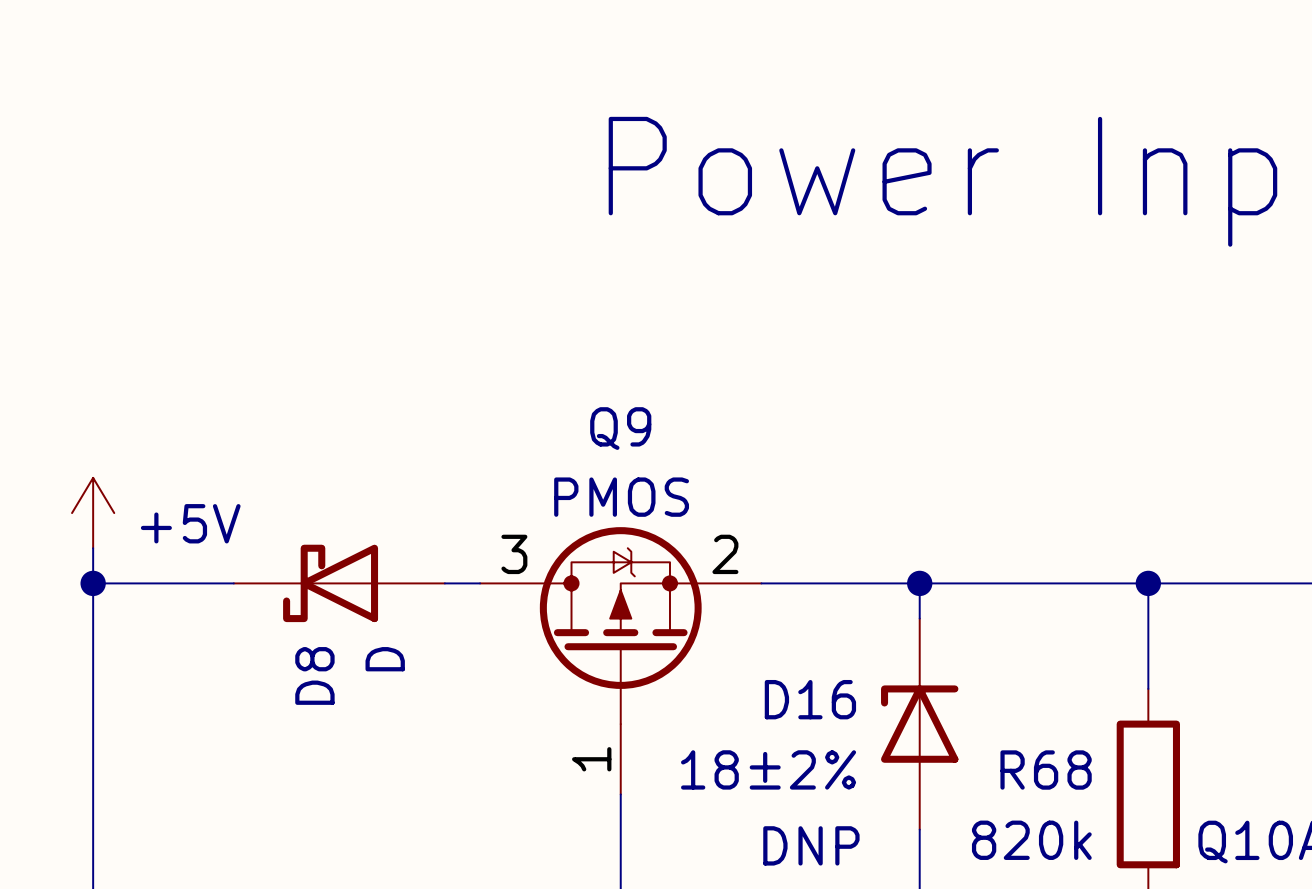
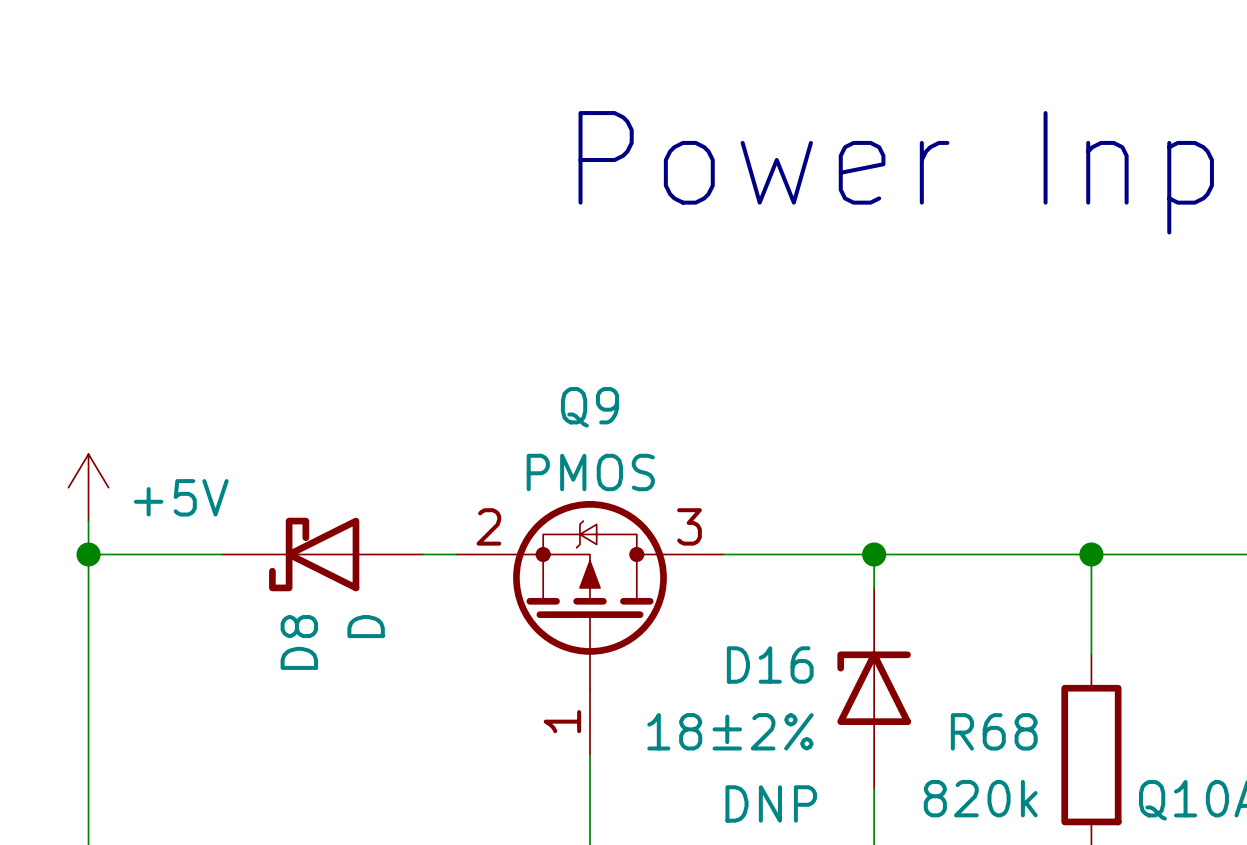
Q9 flip: as is (620, 625) -> left-right (589, 594)

